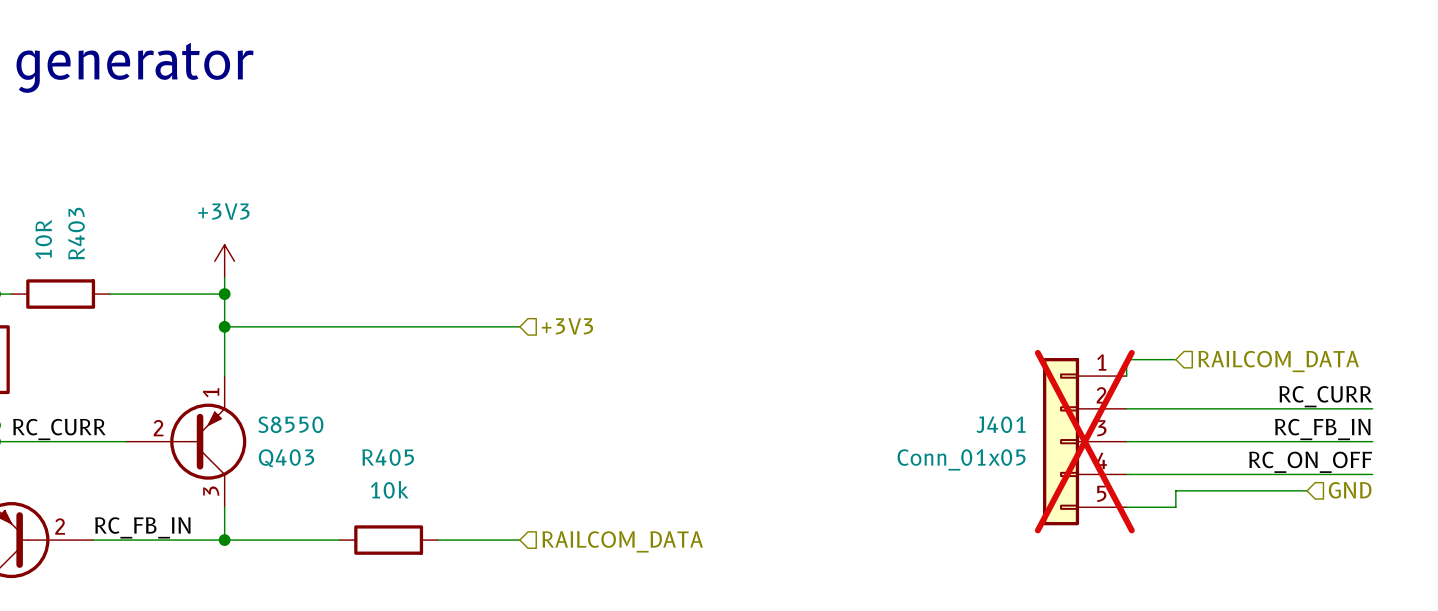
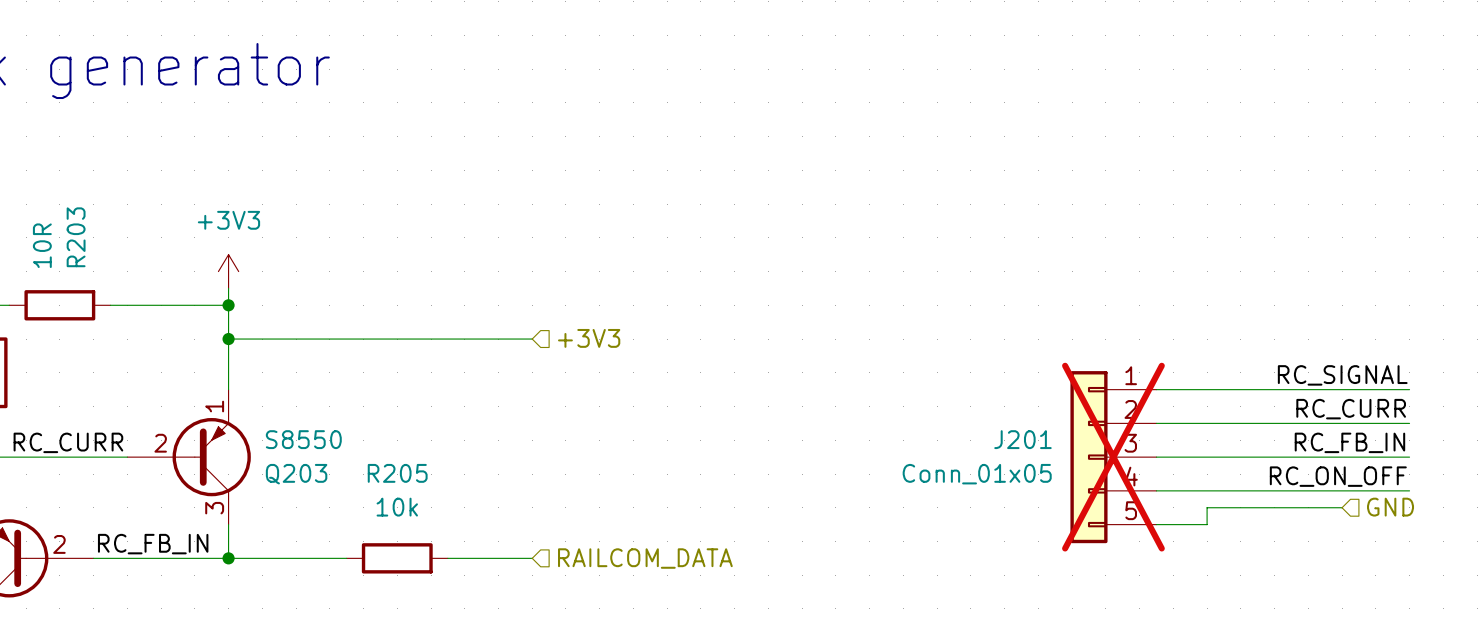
R403 name: R403 (76, 233) -> R203 (76, 237)
wire: (1175, 359) (1126, 359) (1126, 376) -> (1409, 389) (1156, 389)
hierarchical label: RAILCOM_DATA (1278, 361) -> none
label: none -> RC_SIGNAL (1342, 375)
J401 name: J401 (1001, 424) -> J201 (1022, 439)
R405 name: R405 (388, 457) -> R205 (397, 473)
Q403 name: Q403 (286, 458) -> Q203 (296, 474)

